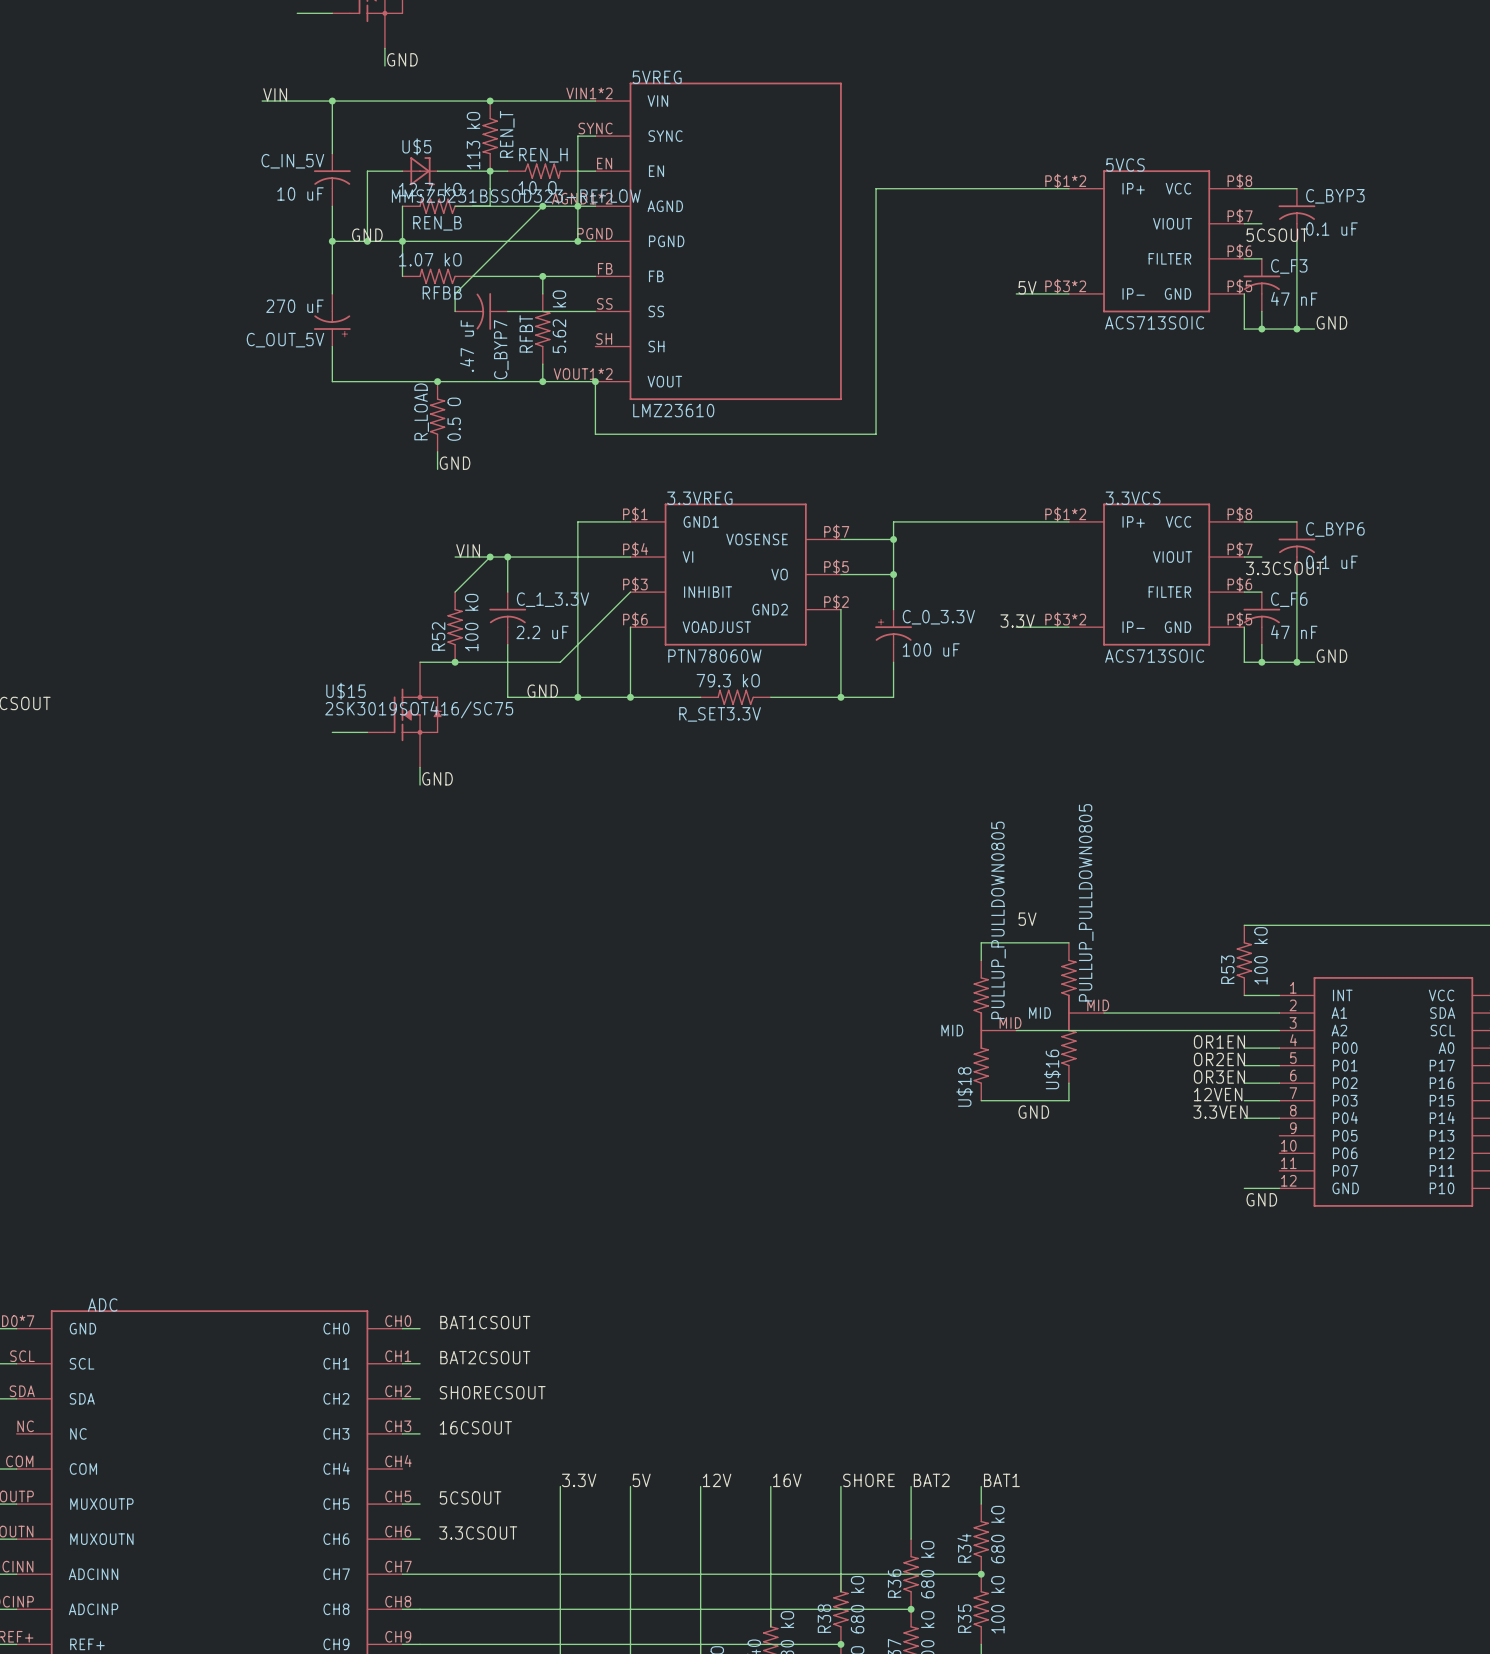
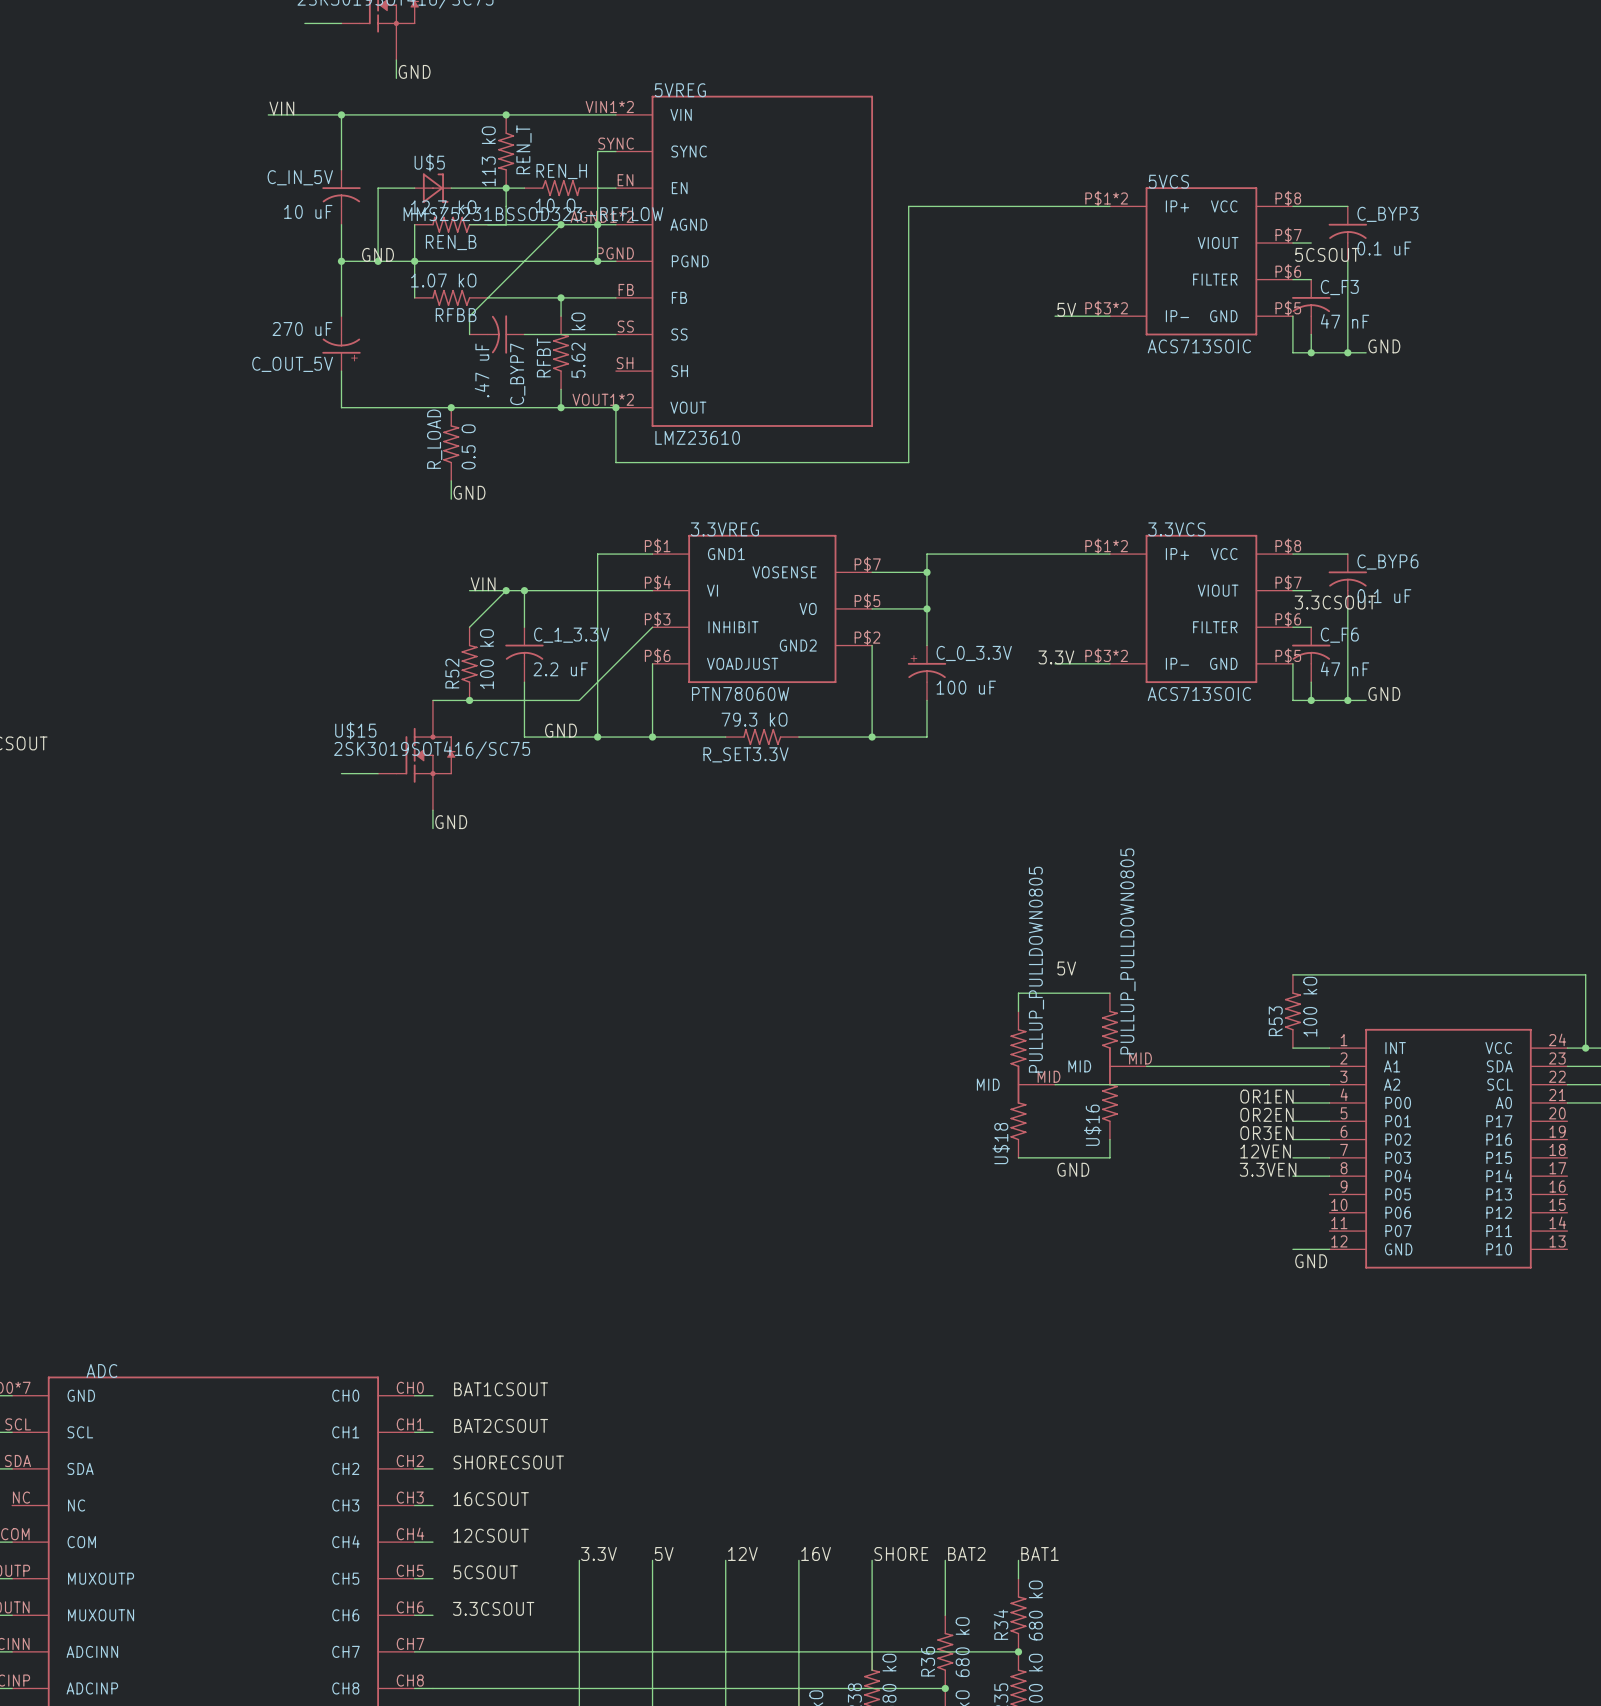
label: none -> 12CSOUT (491, 1535)
wire: none -> (414, 1542) (432, 1542)

